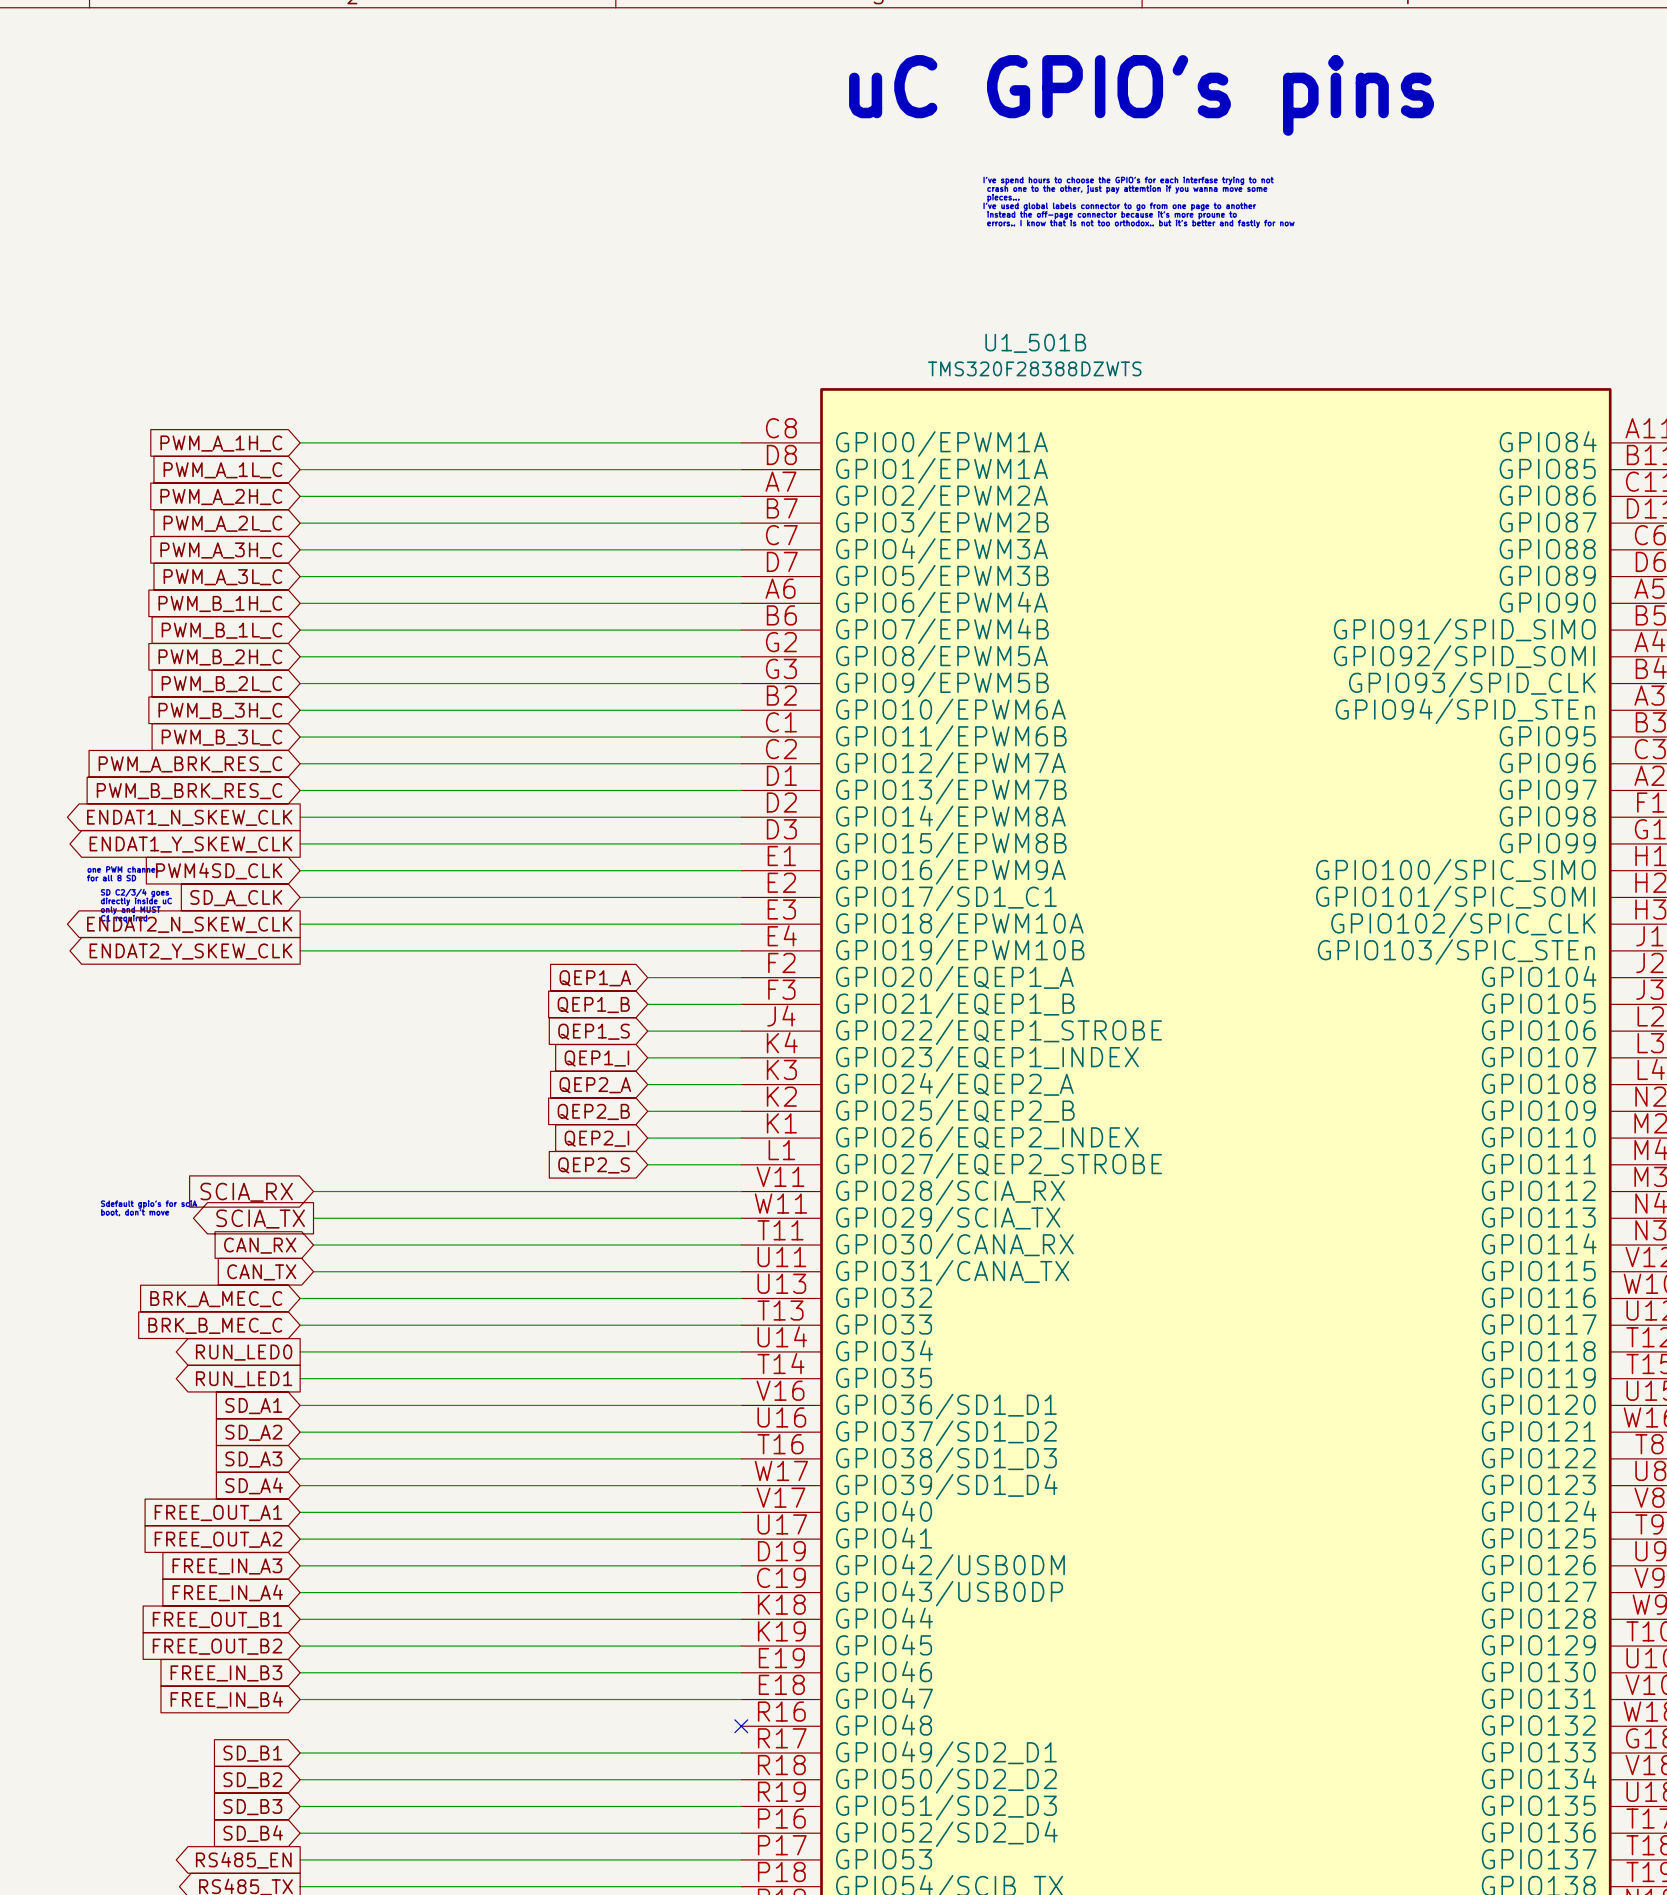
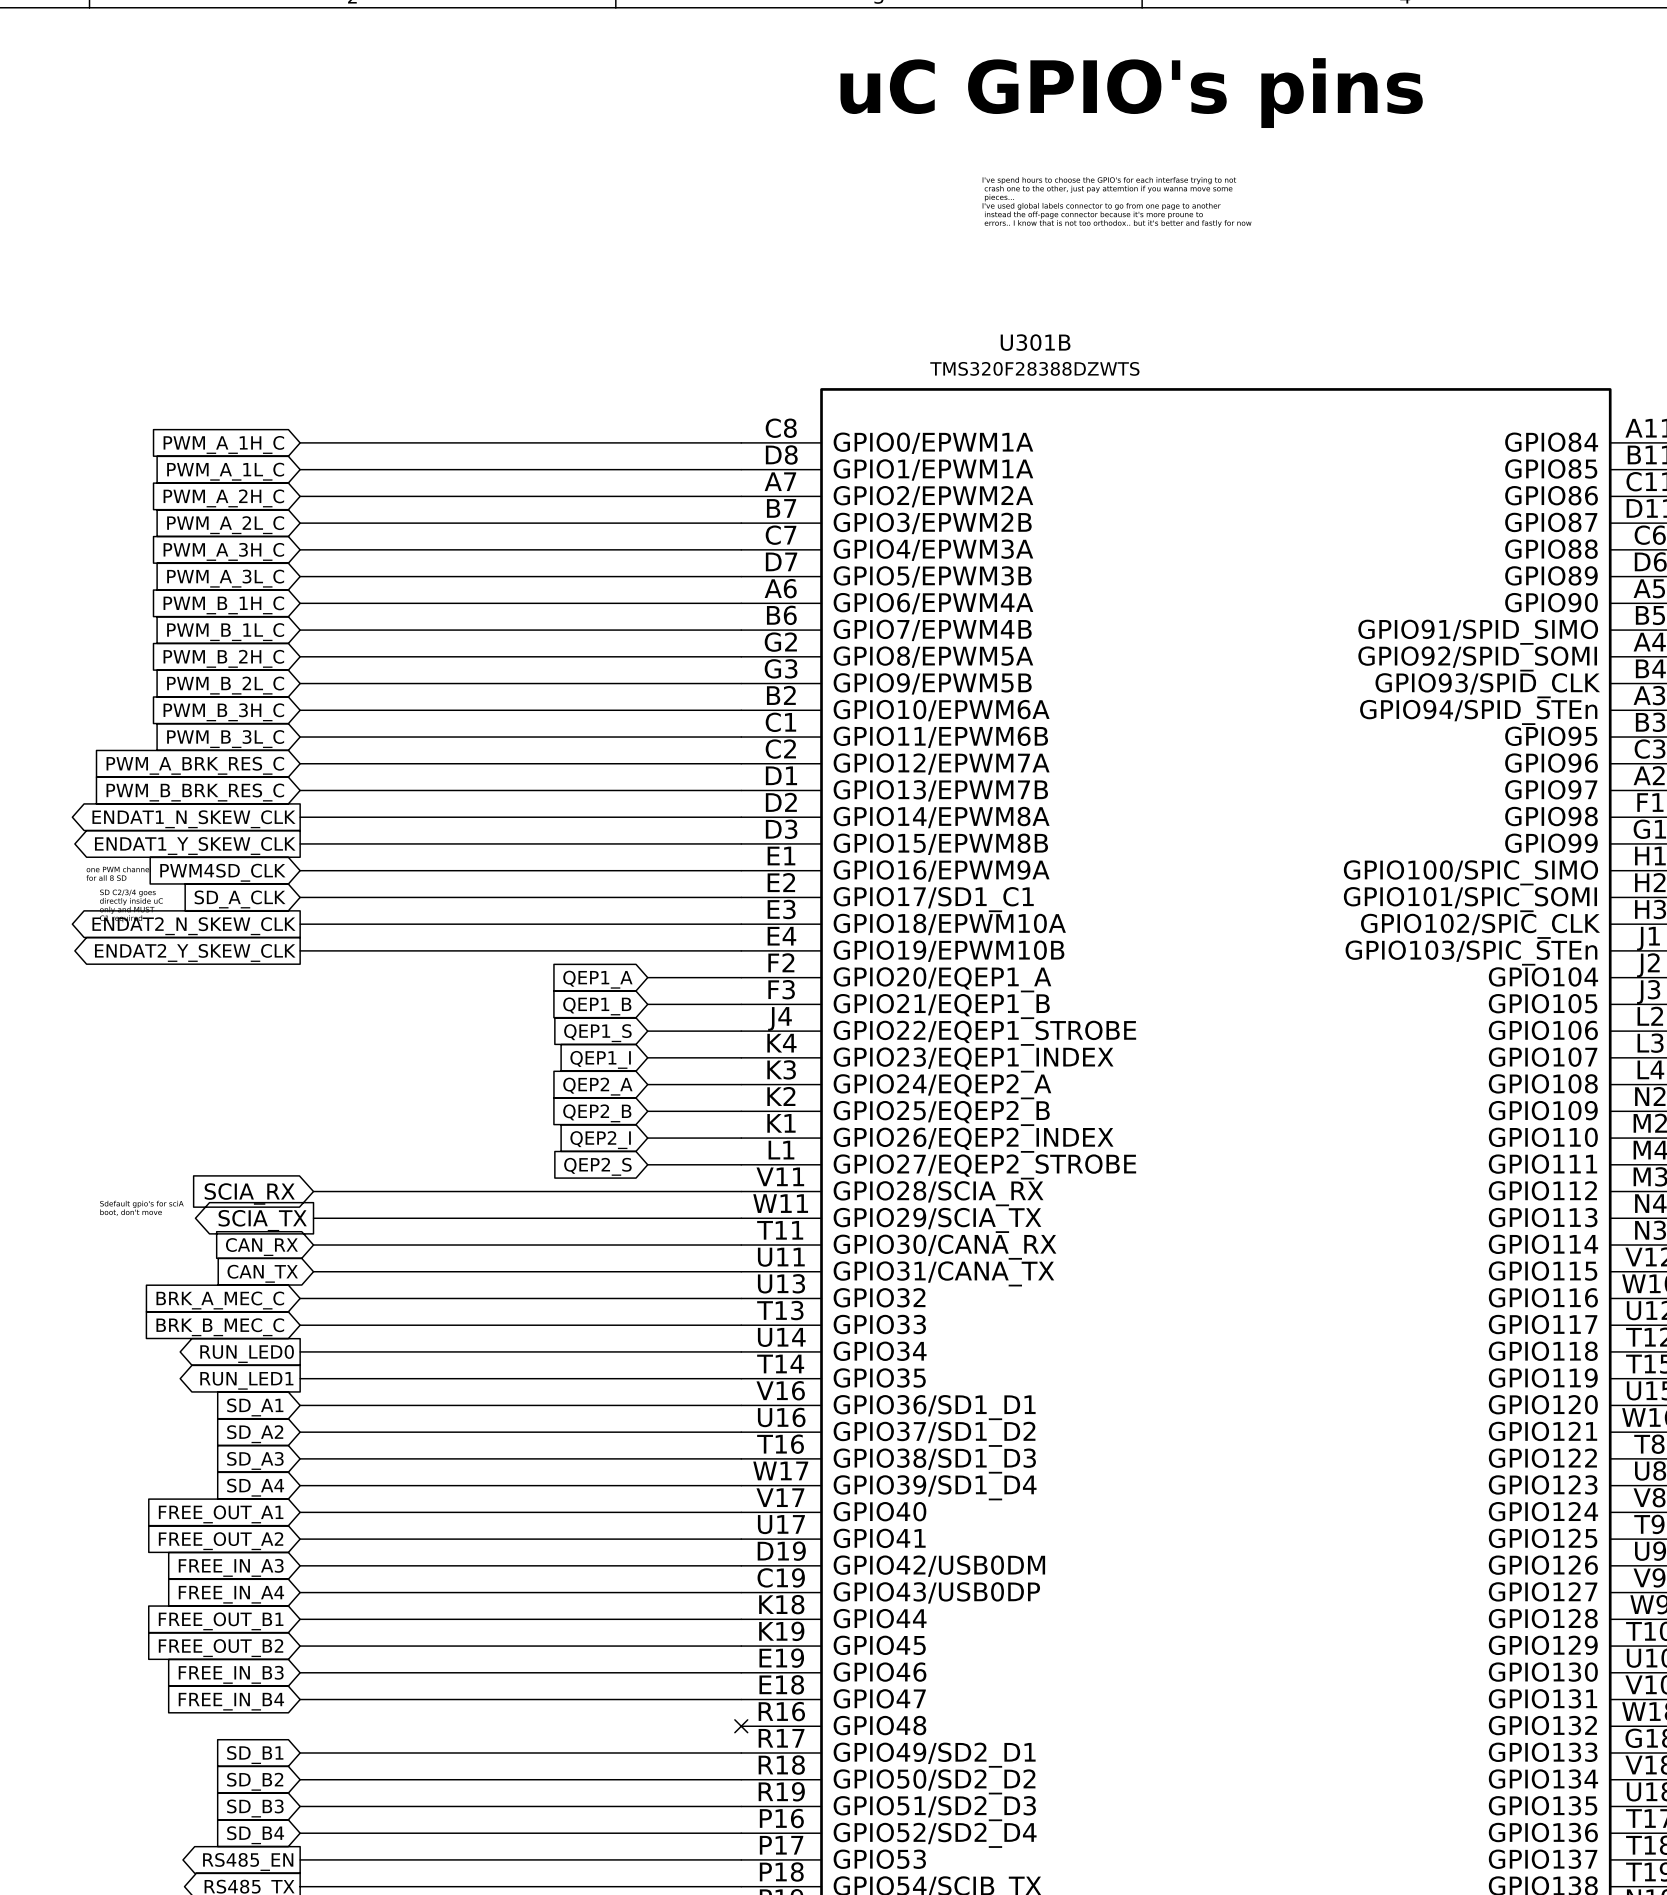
U1_501B name: U1_501B (1035, 343) -> U301B (1035, 342)

